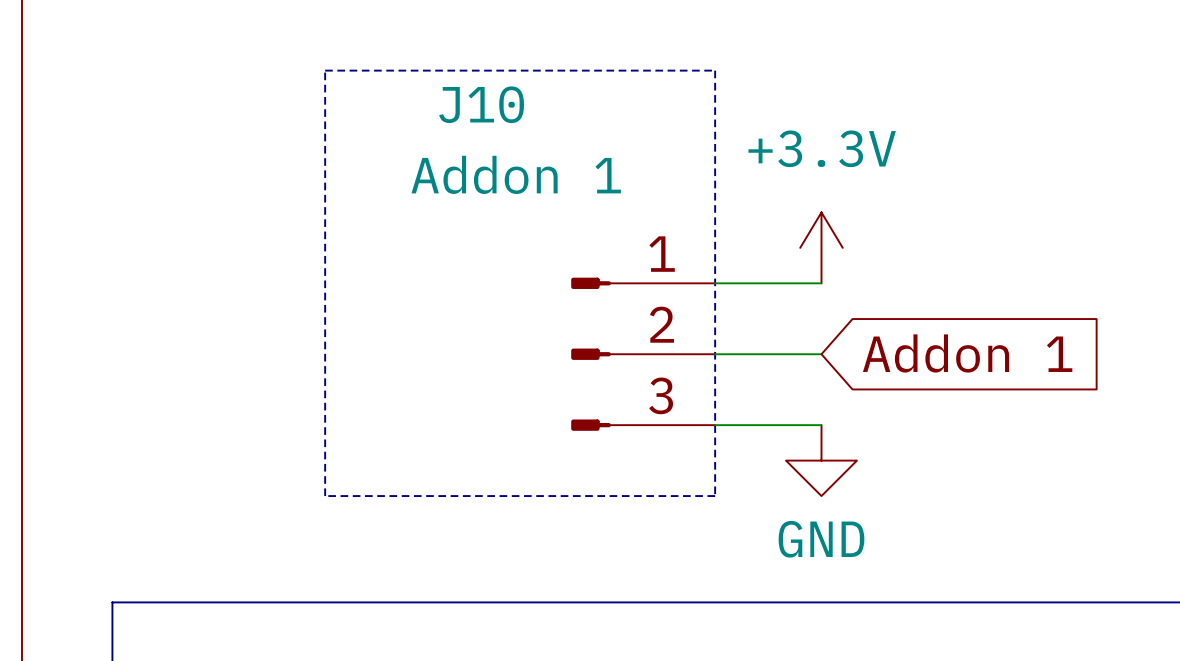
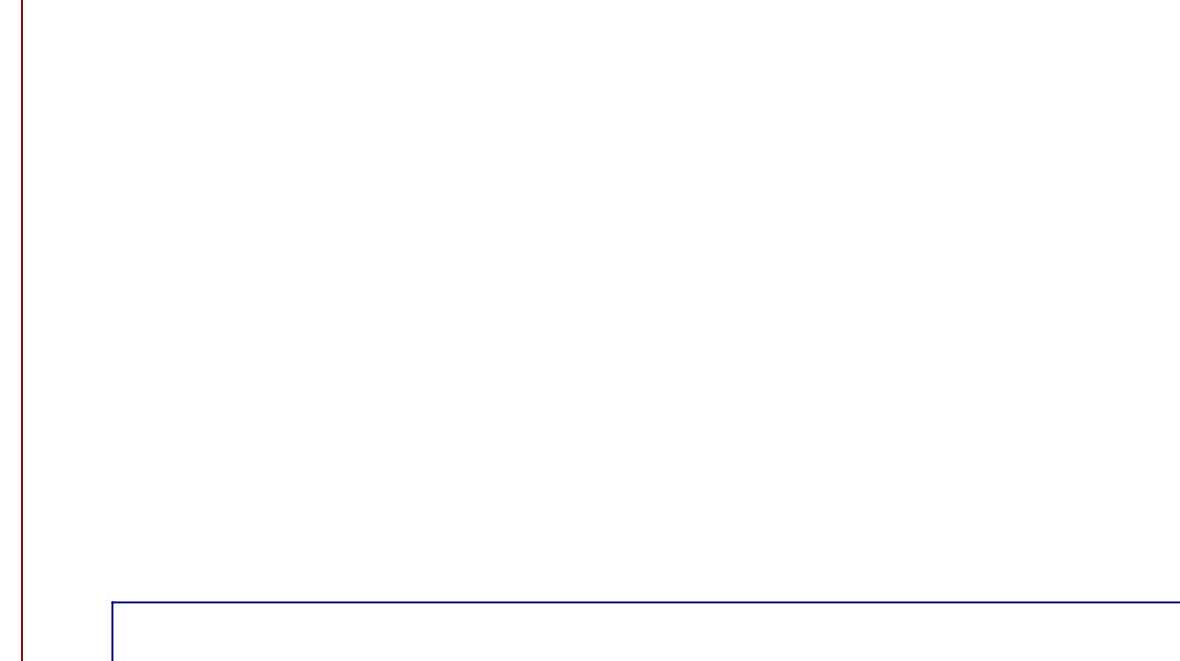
line: (325, 70) (715, 70) (715, 496) (325, 496) (325, 70) -> none
power symbol: +3.3V (821, 247) -> none
wire: (715, 283) (821, 283) -> none
global label: Addon 1 (967, 353) -> none
J10: Addon 1 (643, 354) -> none
wire: (715, 354) (821, 354) -> none
wire: (715, 425) (821, 425) -> none
power symbol: GND (821, 460) -> none

